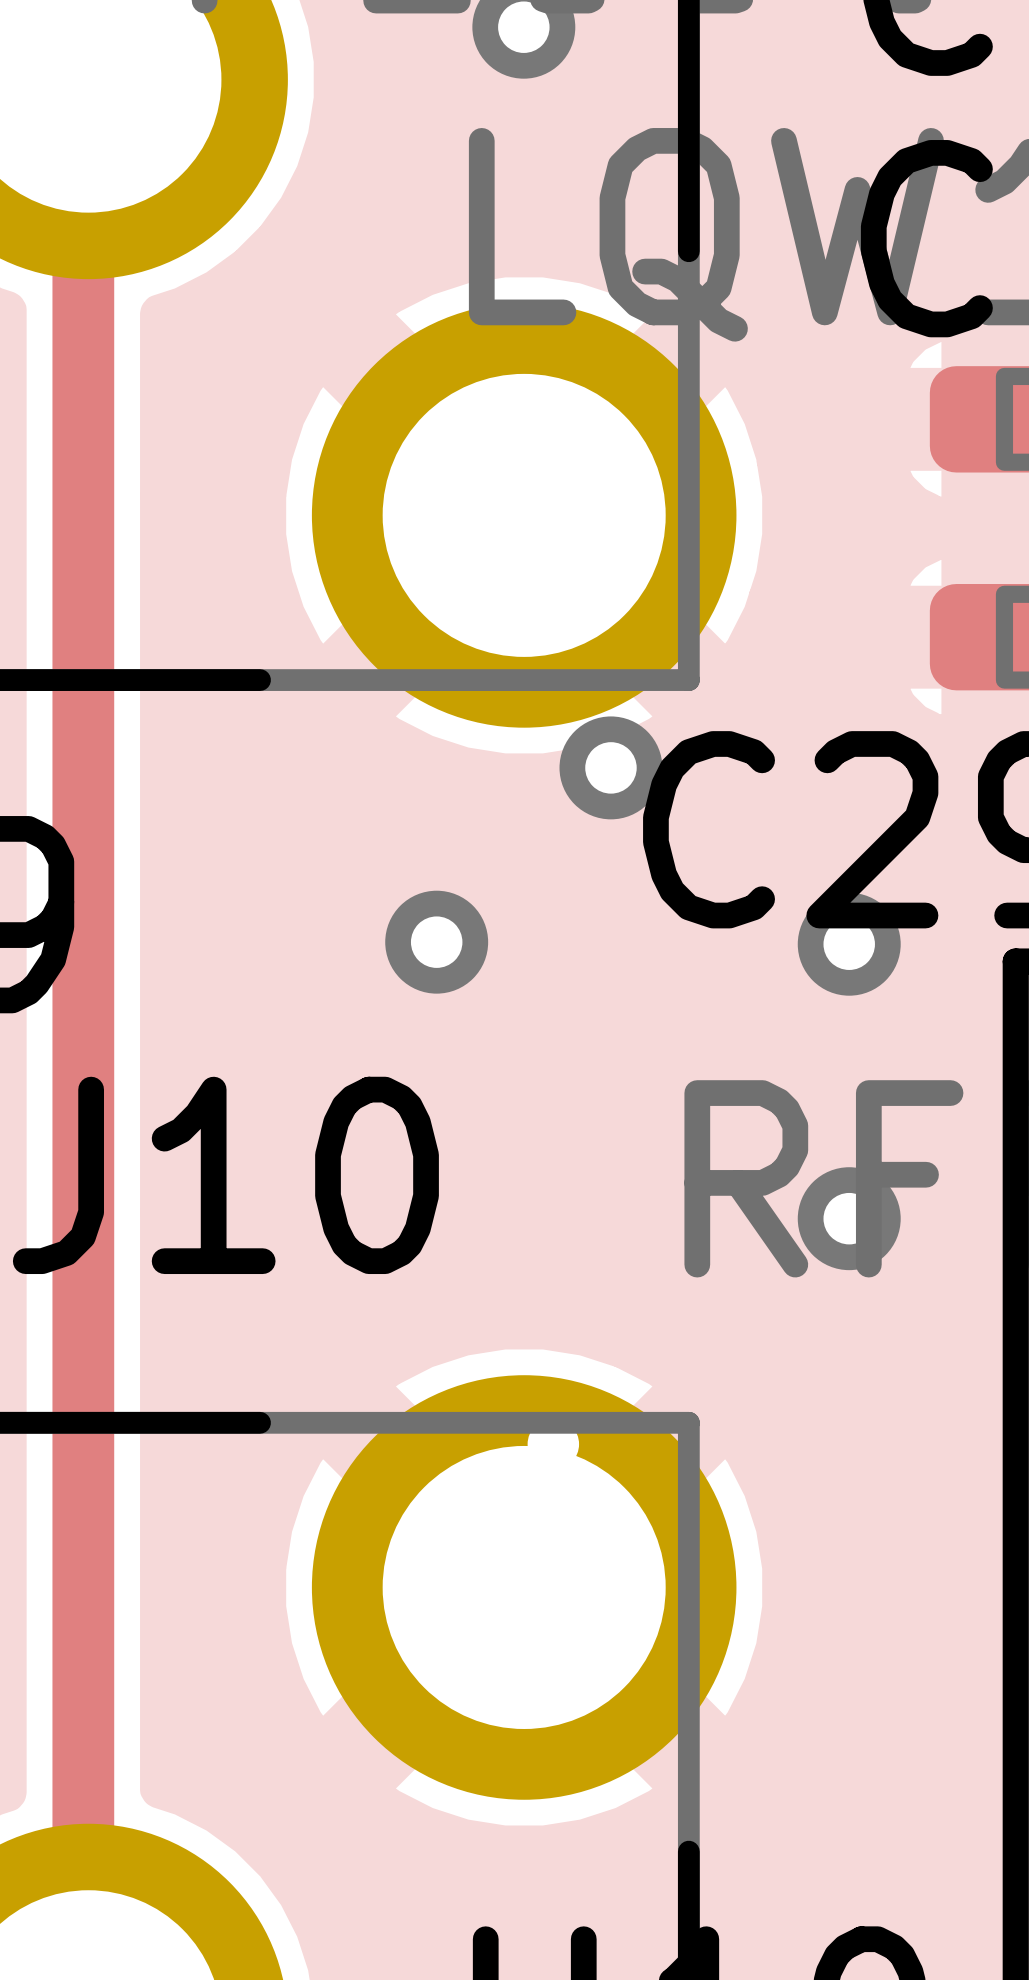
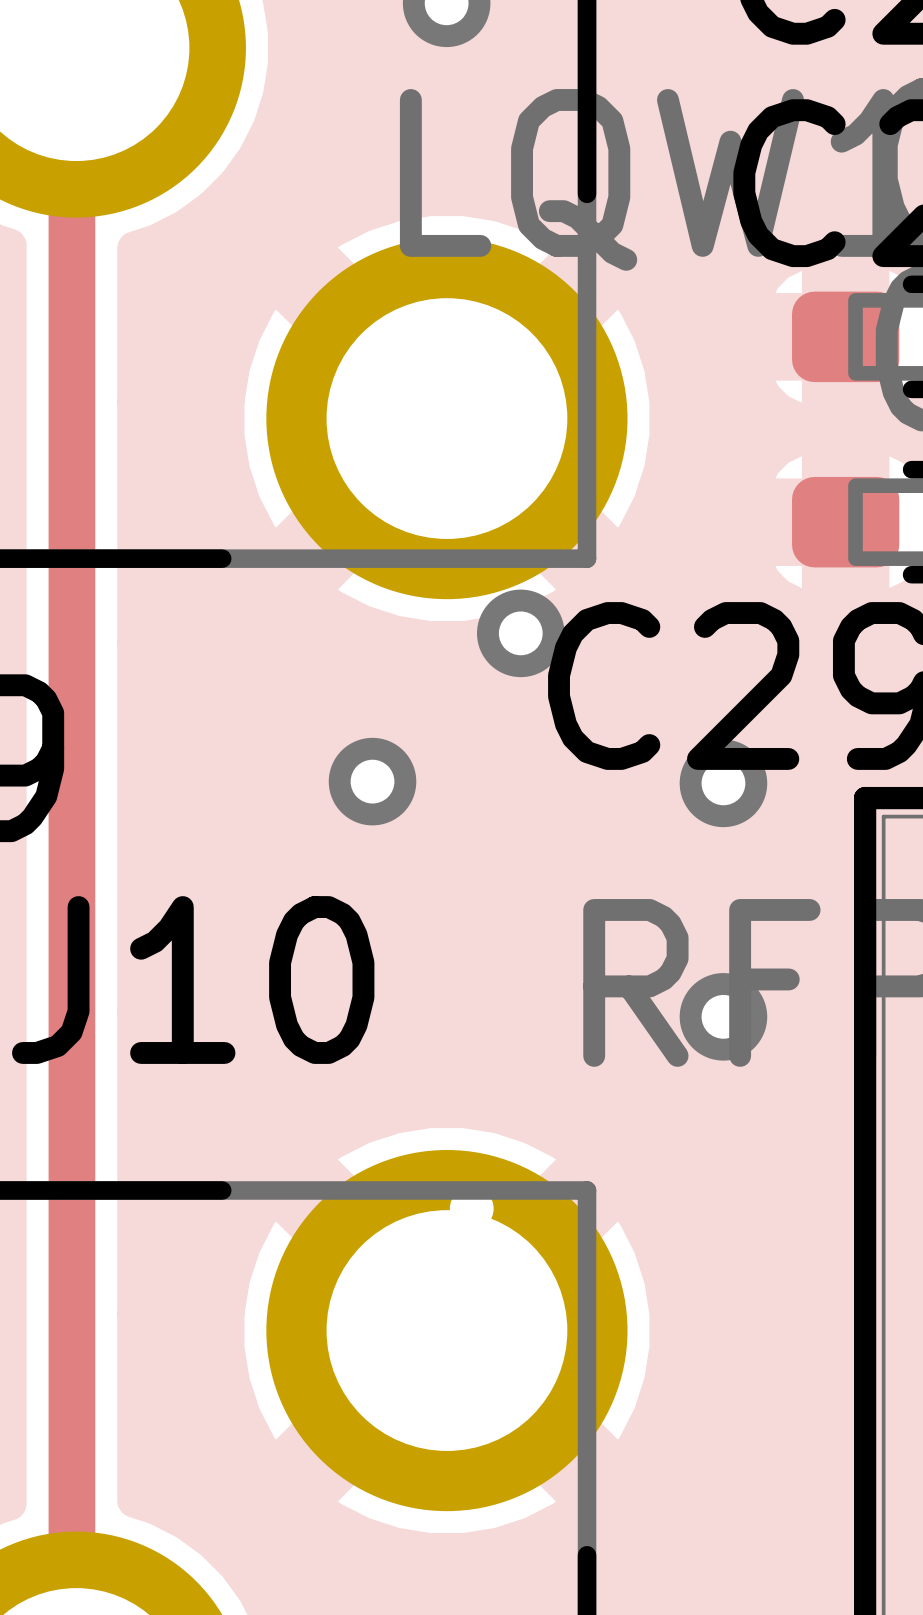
track width: thick (83, 158) (83, 1870) -> thin (71, 115) (71, 1571)

